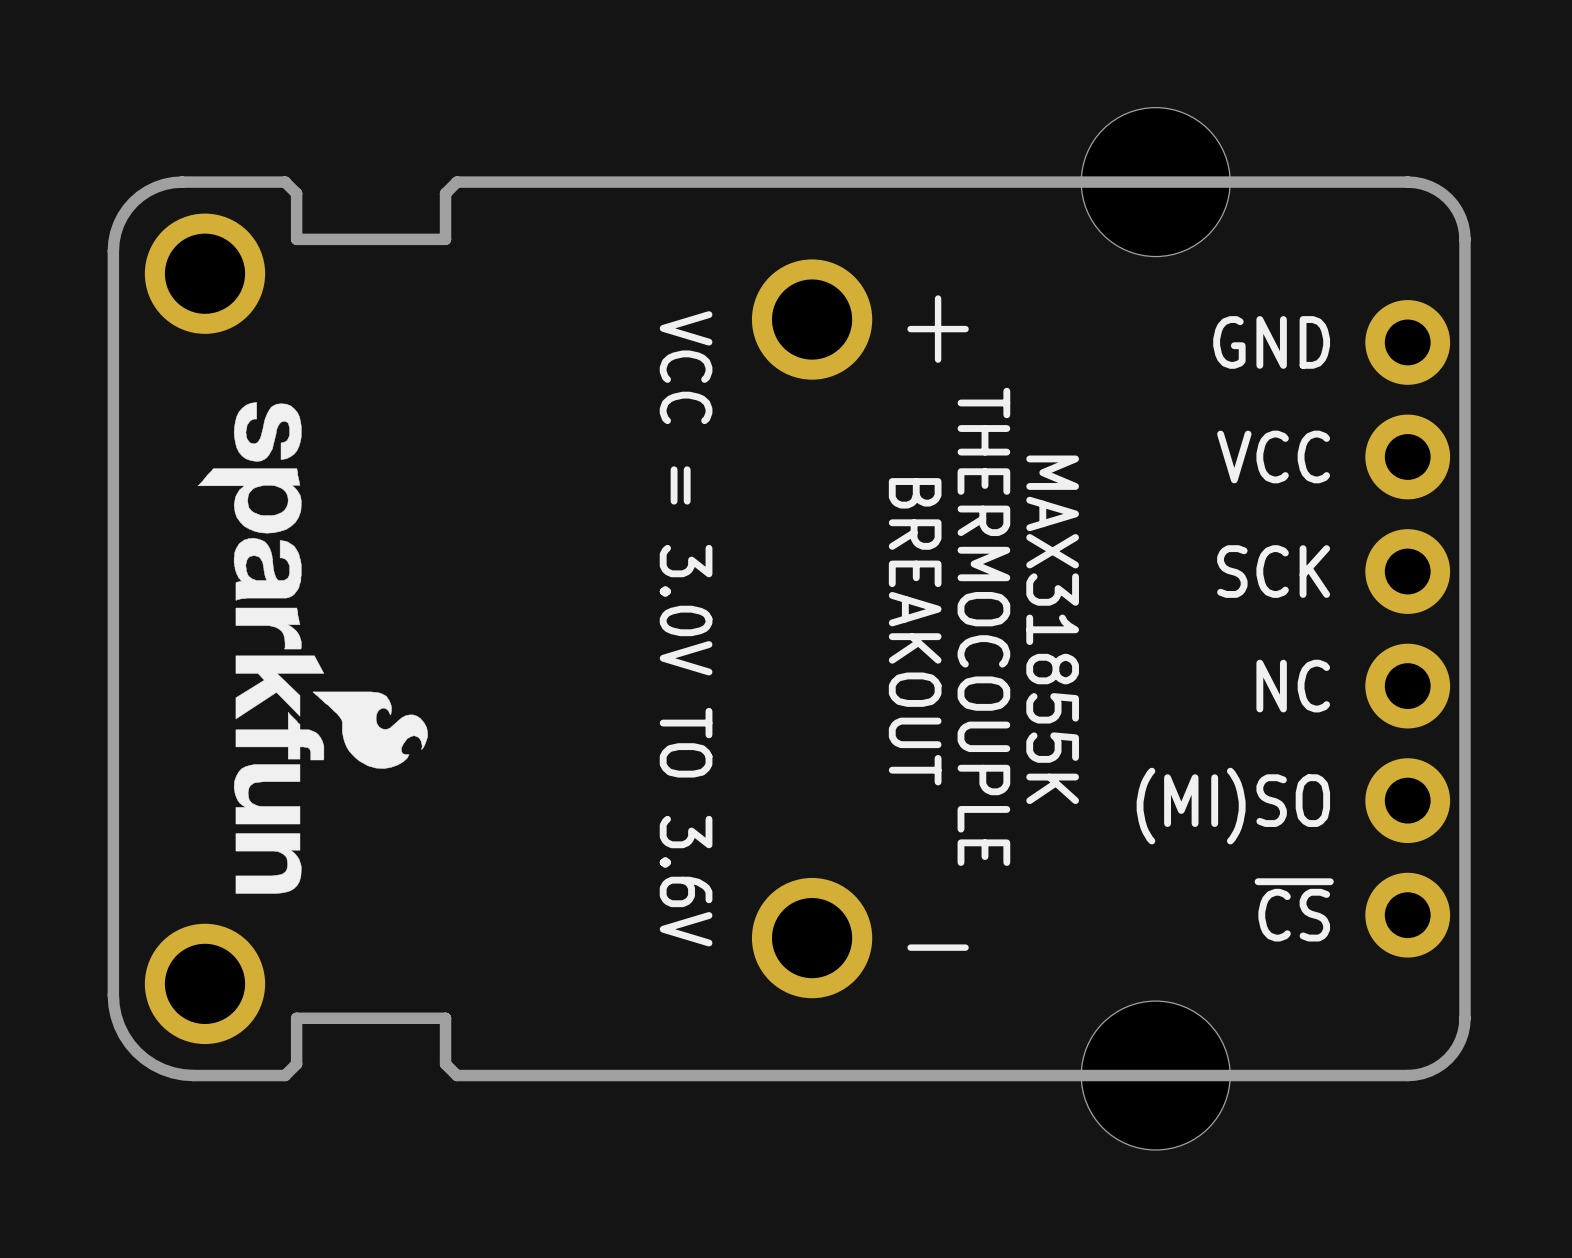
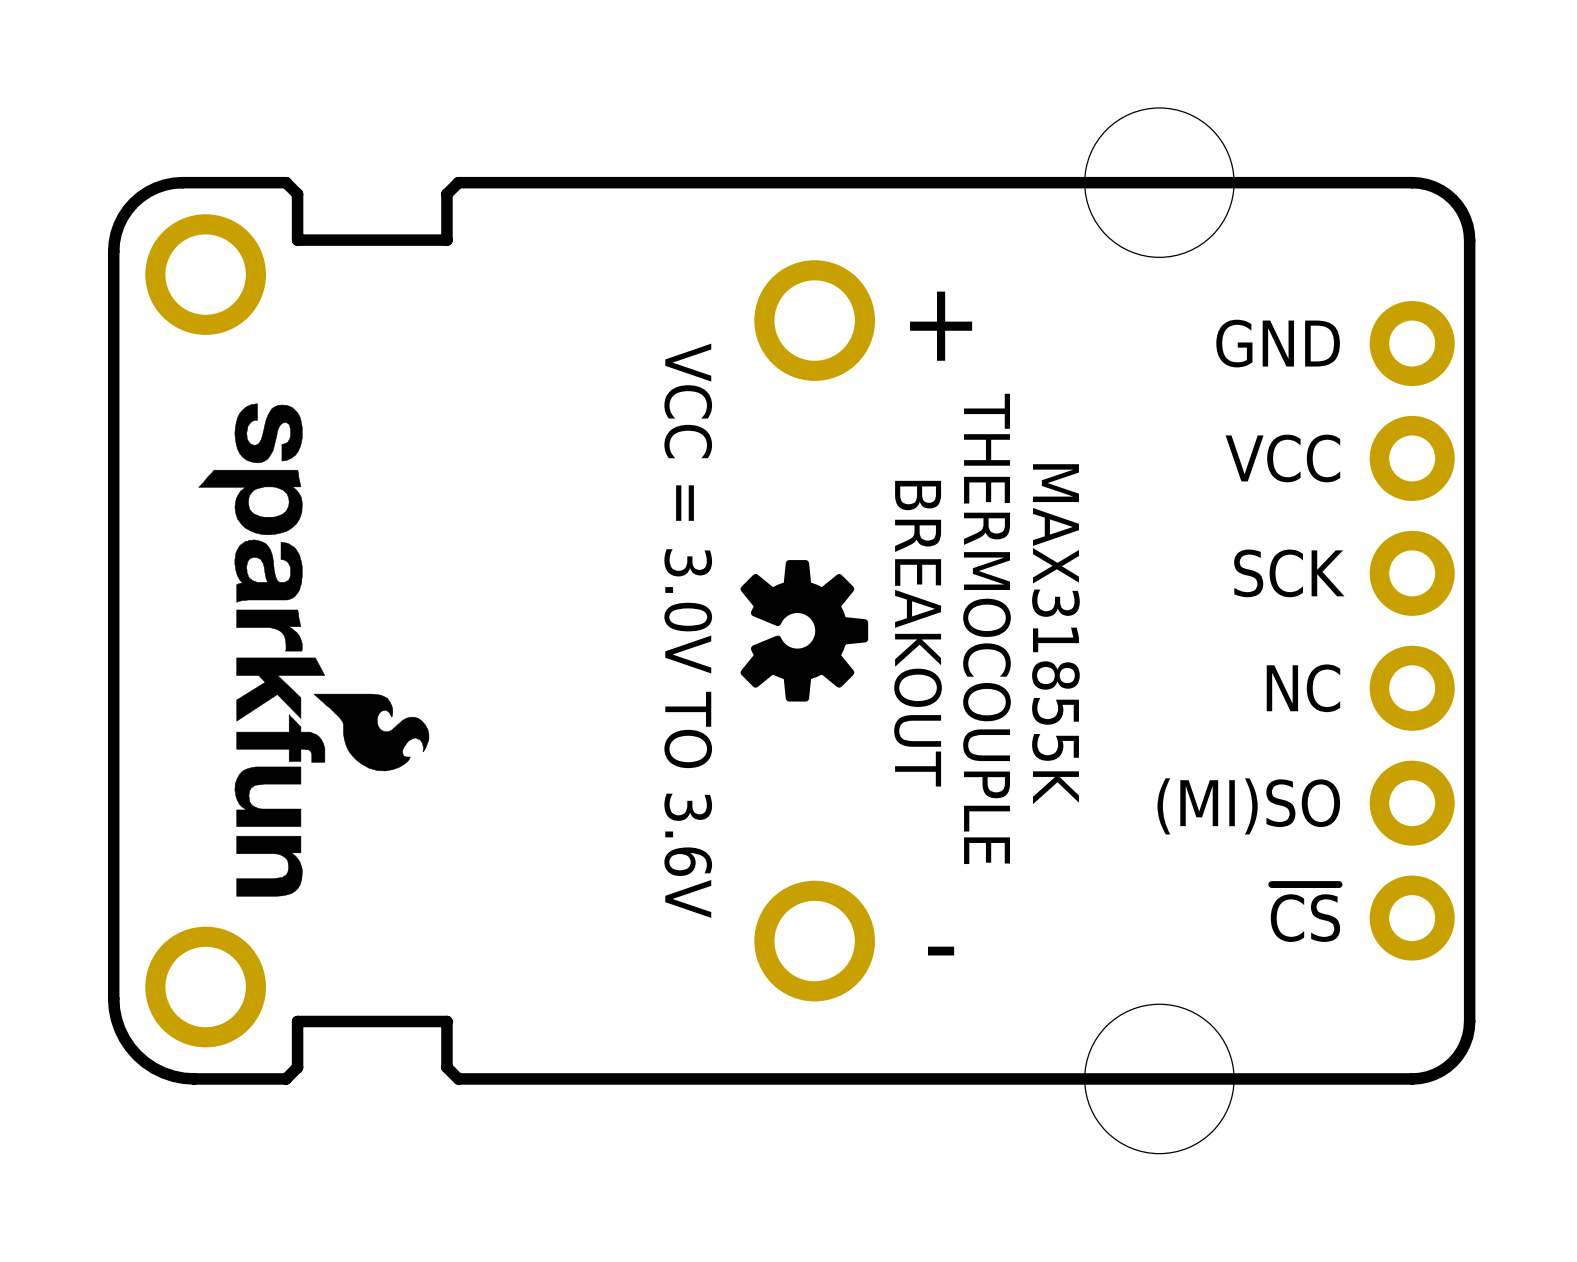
drawing: none -> [740, 560, 869, 702]

